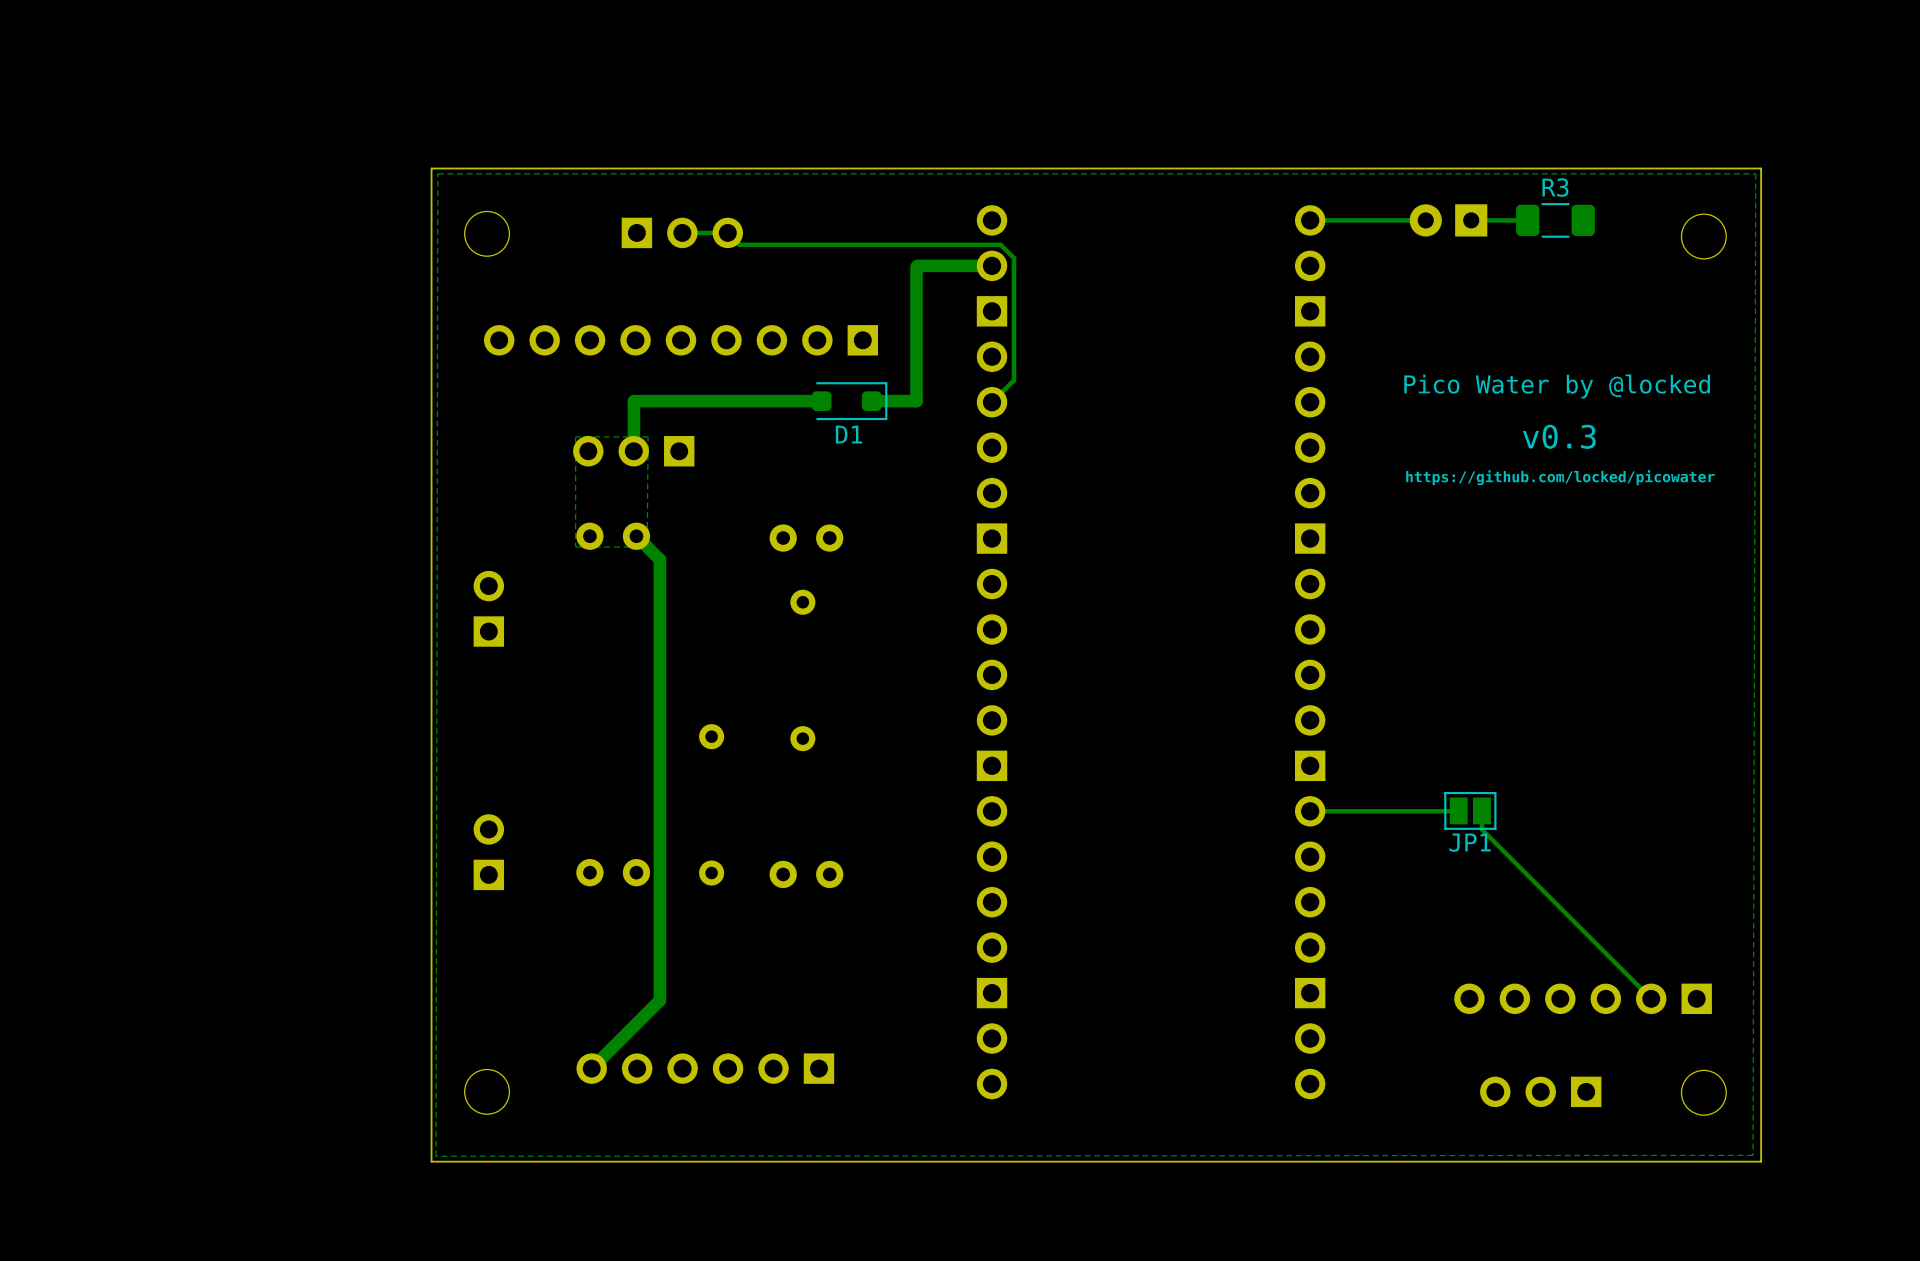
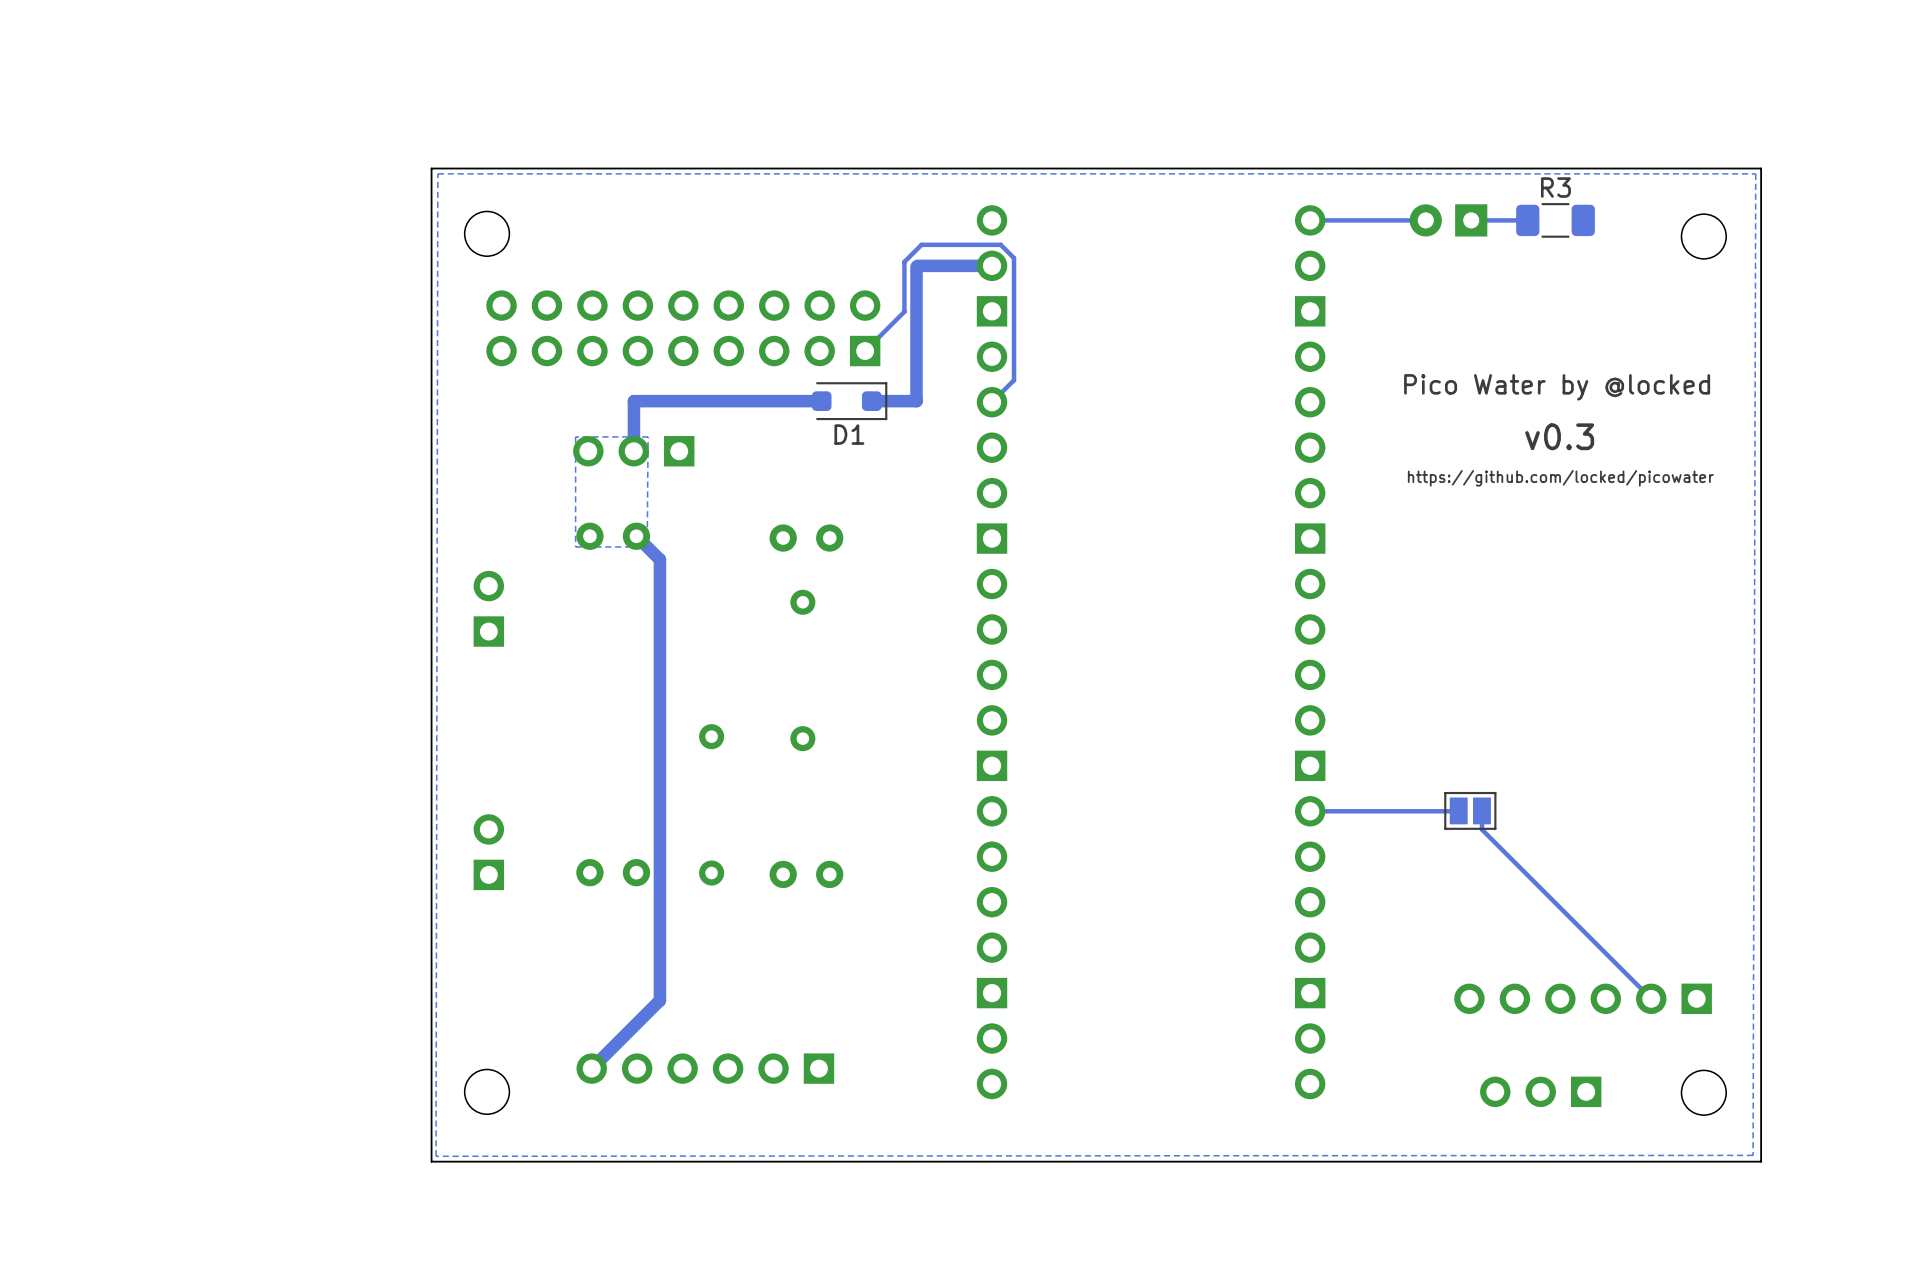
track: (682, 232) (727, 232) (739, 244) (921, 244) -> (865, 351) (904, 311) (904, 261) (921, 244)
part: (682, 232) -> none
part footprint: [483, 325, 879, 356] -> [486, 290, 881, 367]
JP1 name: JP1 (1470, 842) -> none

